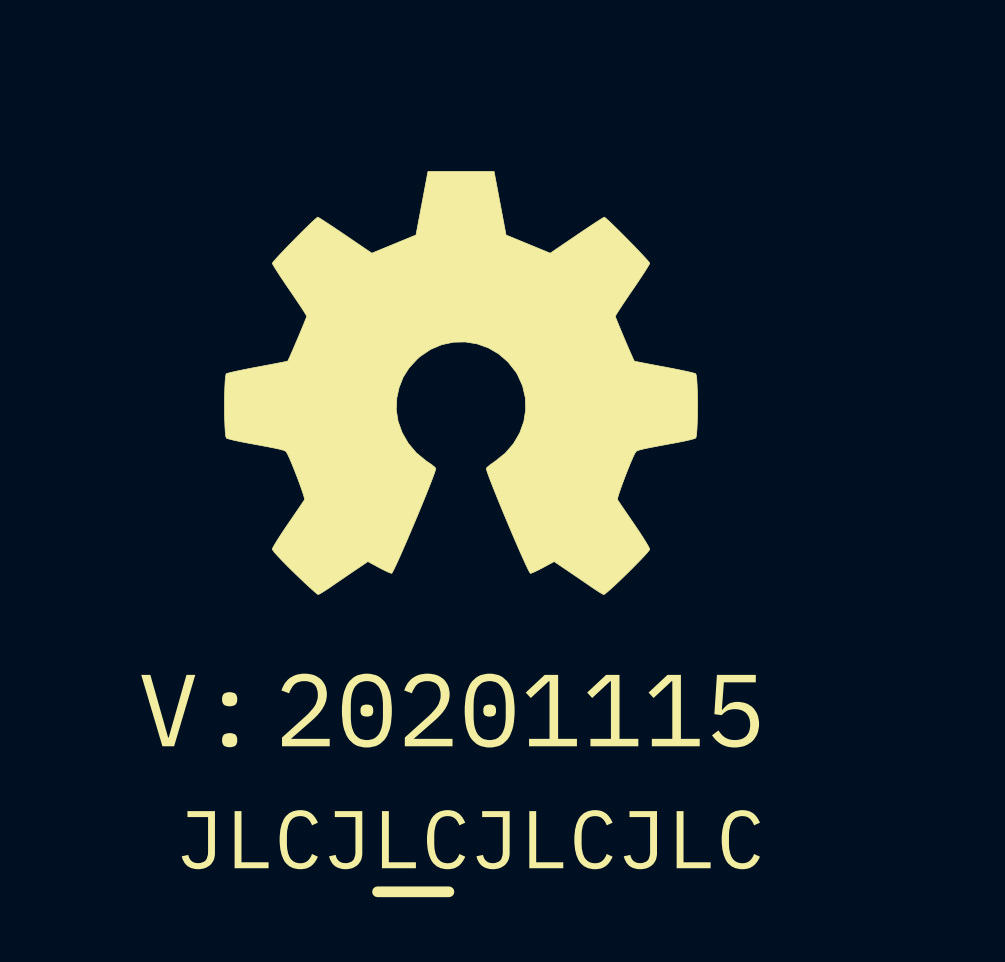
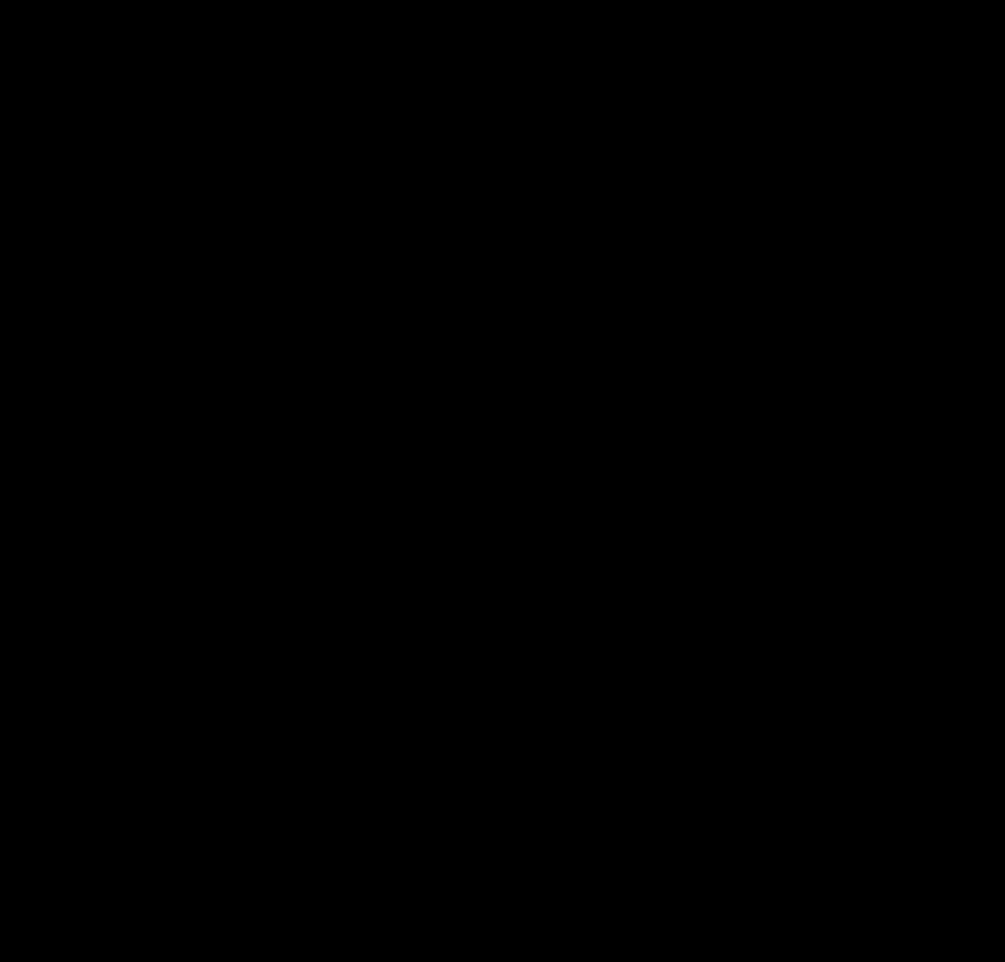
drawing: [224, 171, 698, 898] -> none

